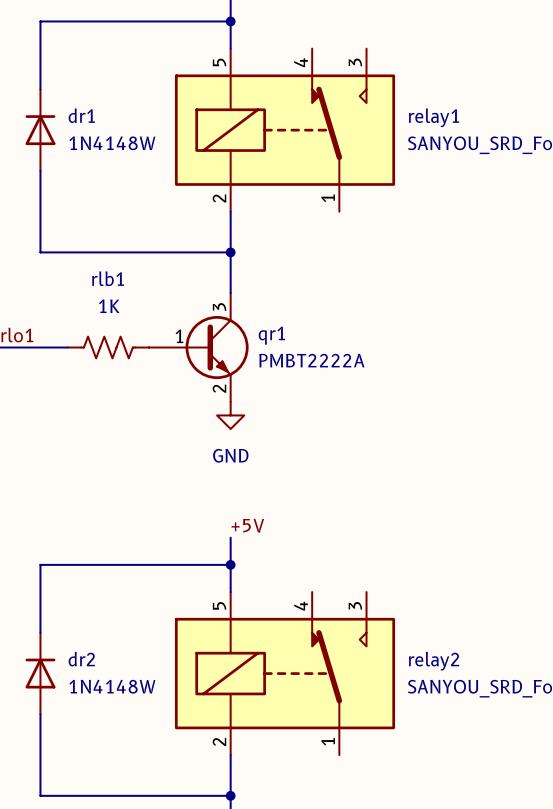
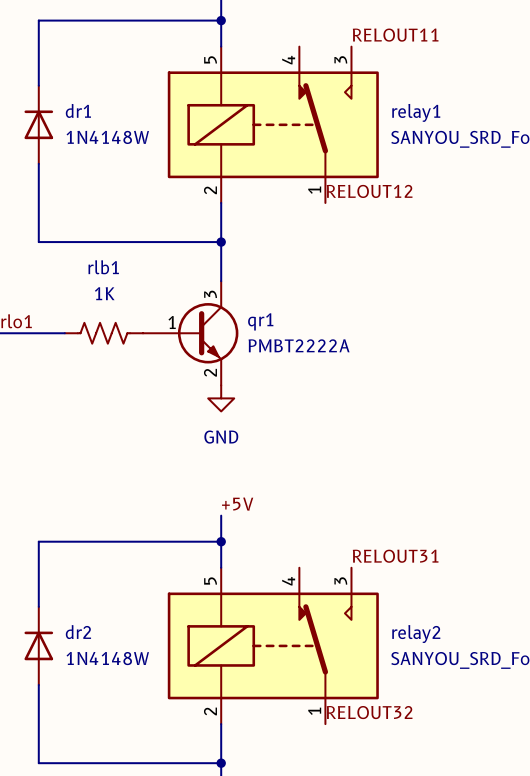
label: none -> RELOUT11 (395, 35)
label: none -> RELOUT12 (369, 191)
label: none -> RELOUT31 (395, 556)
label: none -> RELOUT32 (369, 712)

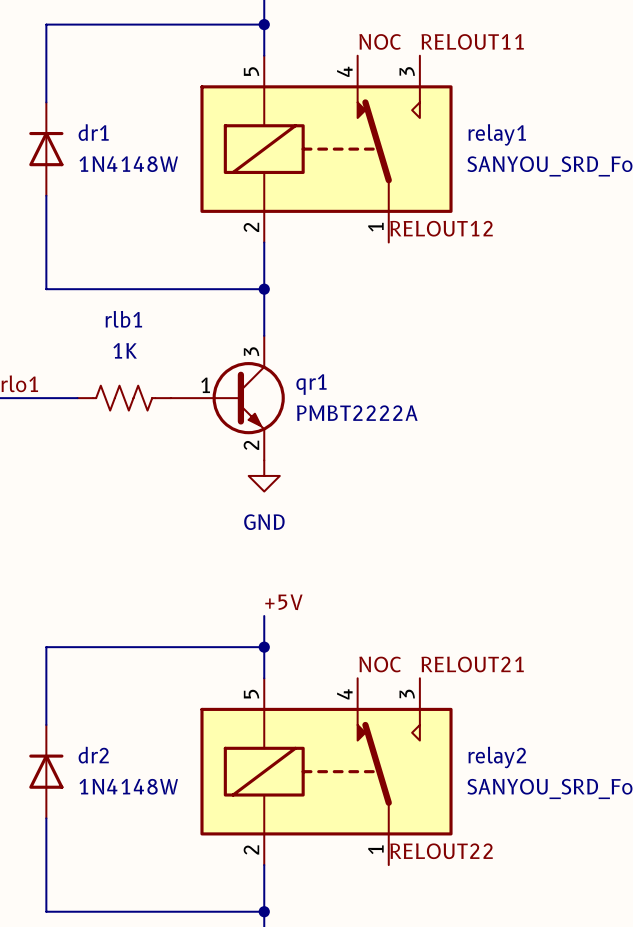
label: none -> NOC (380, 41)
label: none -> NOC (380, 664)
label: RELOUT31 (395, 556) -> RELOUT21 (472, 664)
label: RELOUT32 (369, 712) -> RELOUT22 (441, 851)

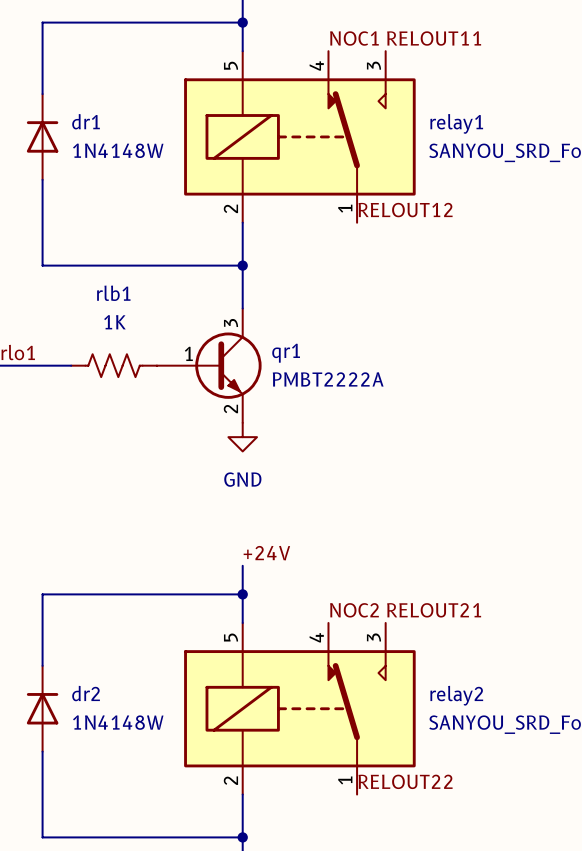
label: NOC (380, 41) -> NOC1 (354, 38)
label: +5V (283, 602) -> +24V (266, 553)
label: NOC (380, 664) -> NOC2 (354, 610)

